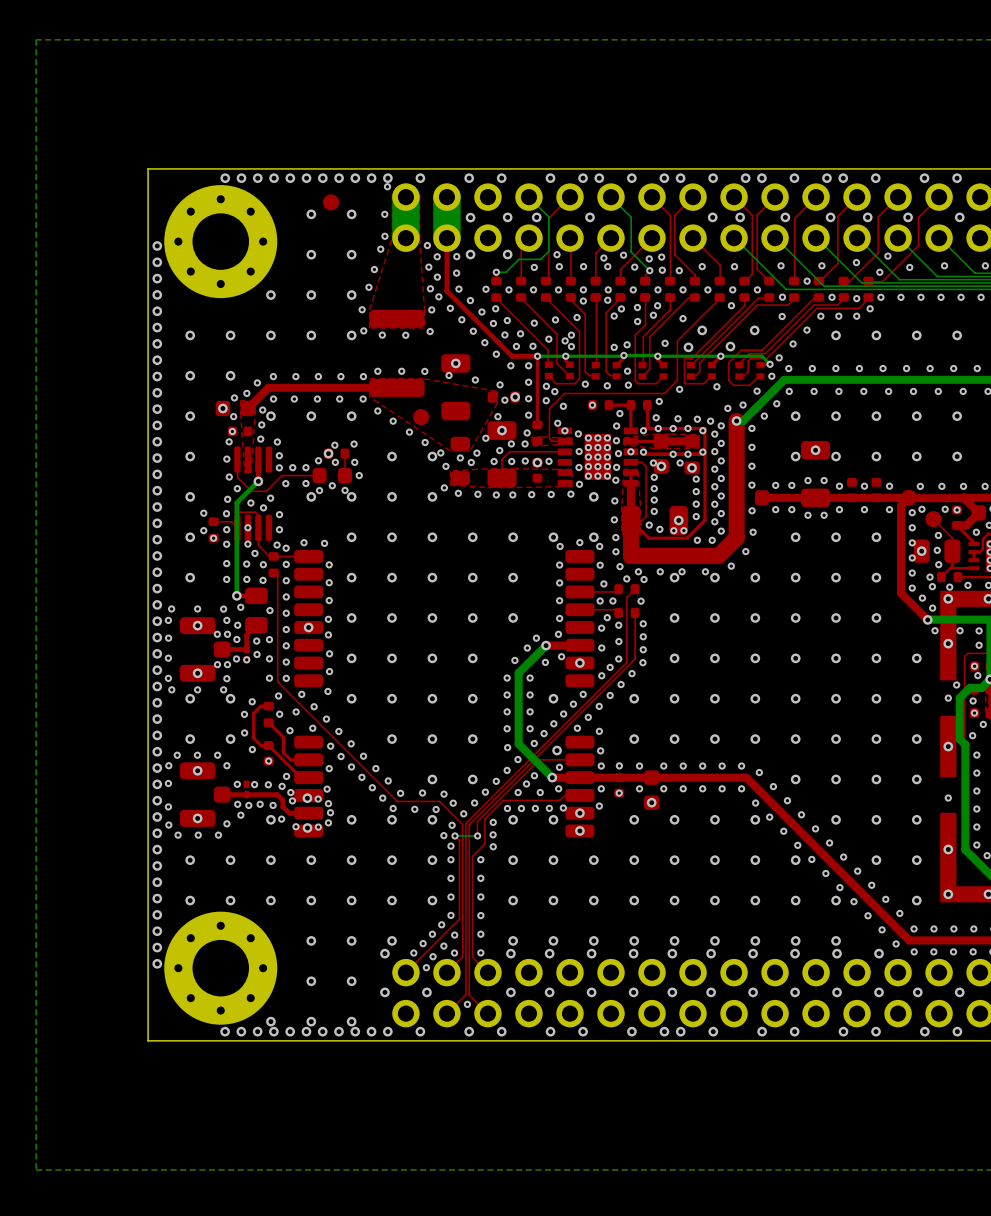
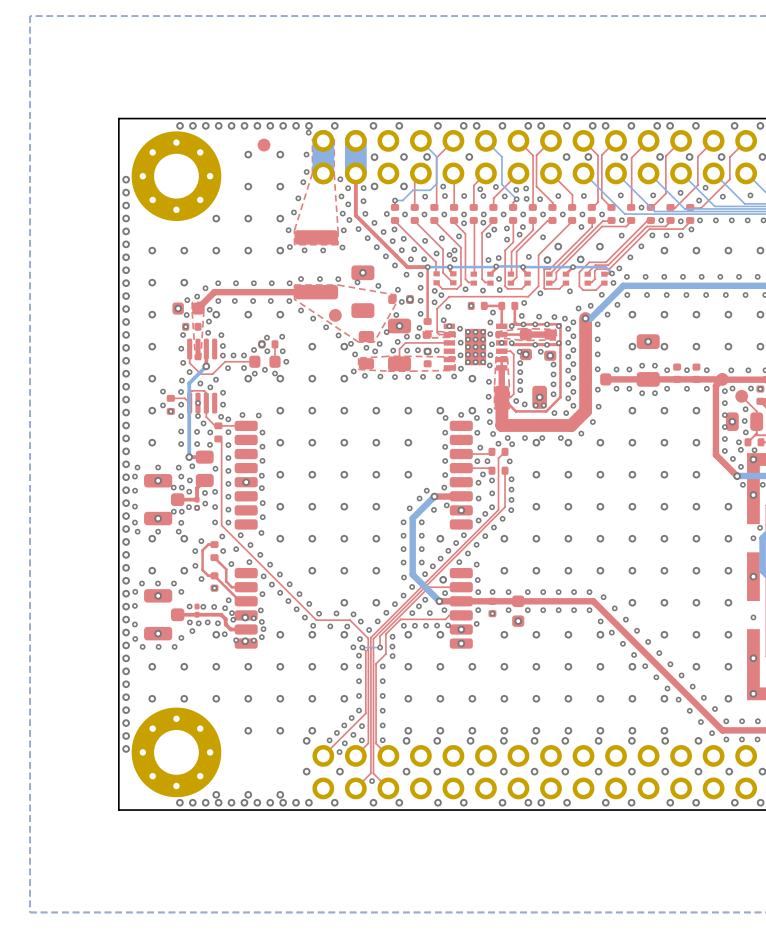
via: (311, 981) -> none
via: (351, 981) -> none

